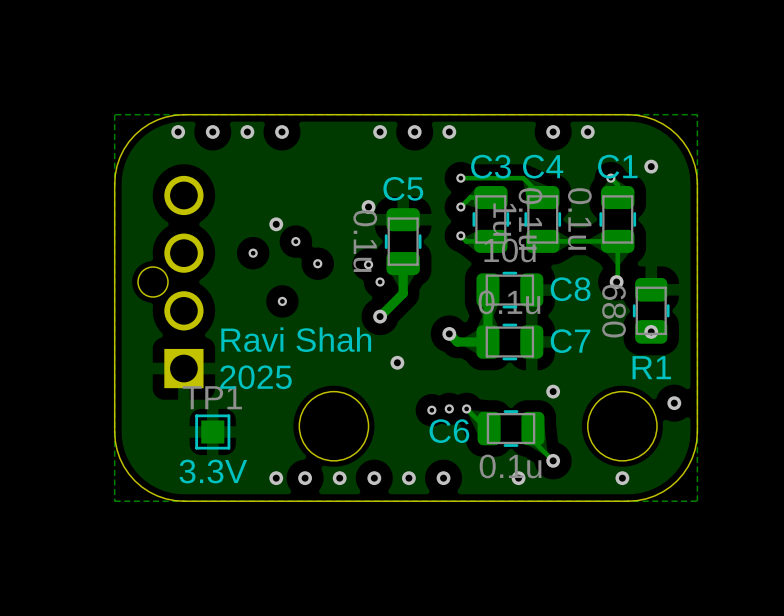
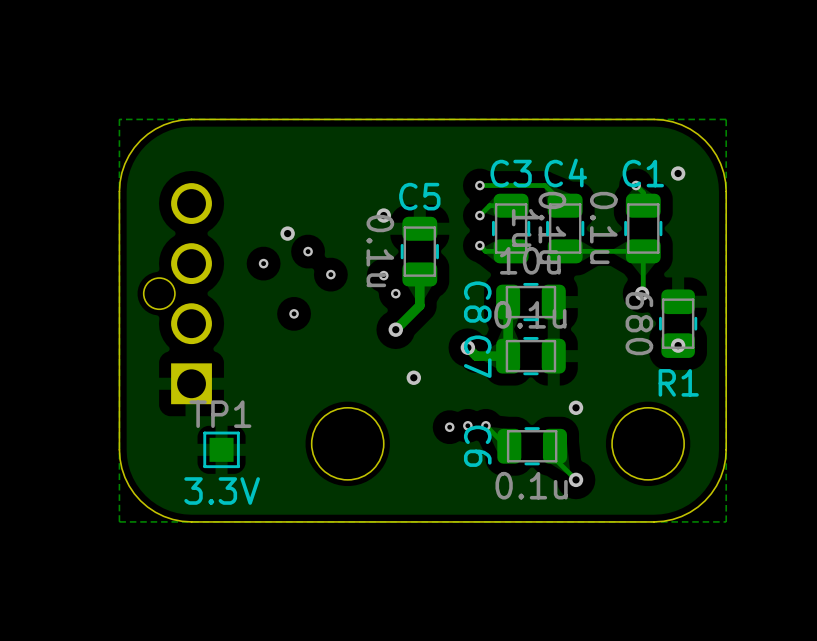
via: (178, 132) -> none
via: (212, 132) -> none
via: (247, 132) -> none
via: (282, 132) -> none
via: (380, 132) -> none
via: (414, 132) -> none
via: (449, 132) -> none
via: (553, 132) -> none
via: (587, 132) -> none
C8 name rotation: 0° (570, 289) -> 90° clockwise (477, 302)
C8 name position: C8 (570, 289) -> C8 (477, 302)
text: Ravi Shah (296, 339) -> none
C7 name rotation: 0° (570, 341) -> 90° clockwise (477, 356)
C7 name position: C7 (570, 341) -> C7 (477, 356)
text: 2025 (255, 377) -> none
via: (674, 403) -> none
C6 name rotation: 0° (449, 431) -> 90° clockwise (477, 446)
via: (276, 478) -> none
via: (305, 478) -> none
via: (339, 478) -> none
via: (374, 478) -> none
via: (408, 478) -> none
via: (443, 478) -> none
via: (518, 478) -> none
via: (622, 478) -> none

